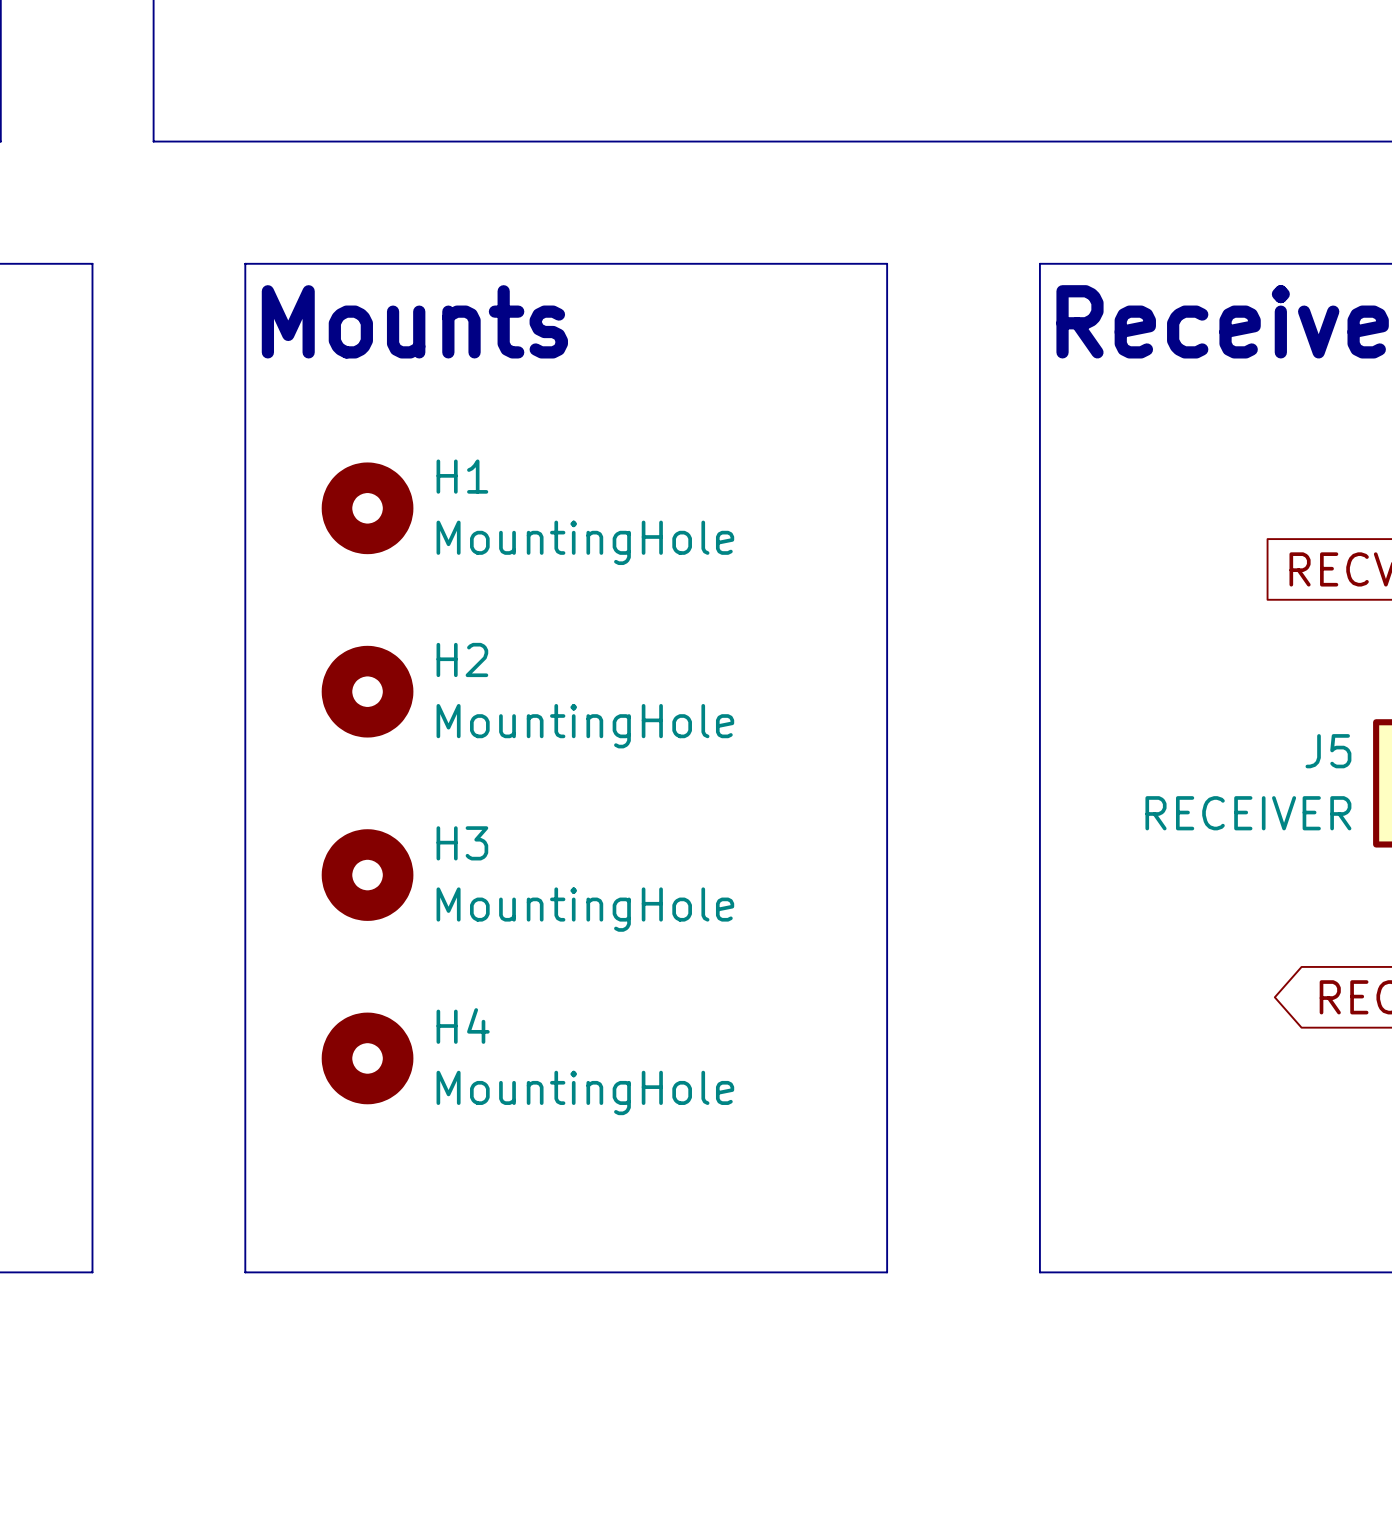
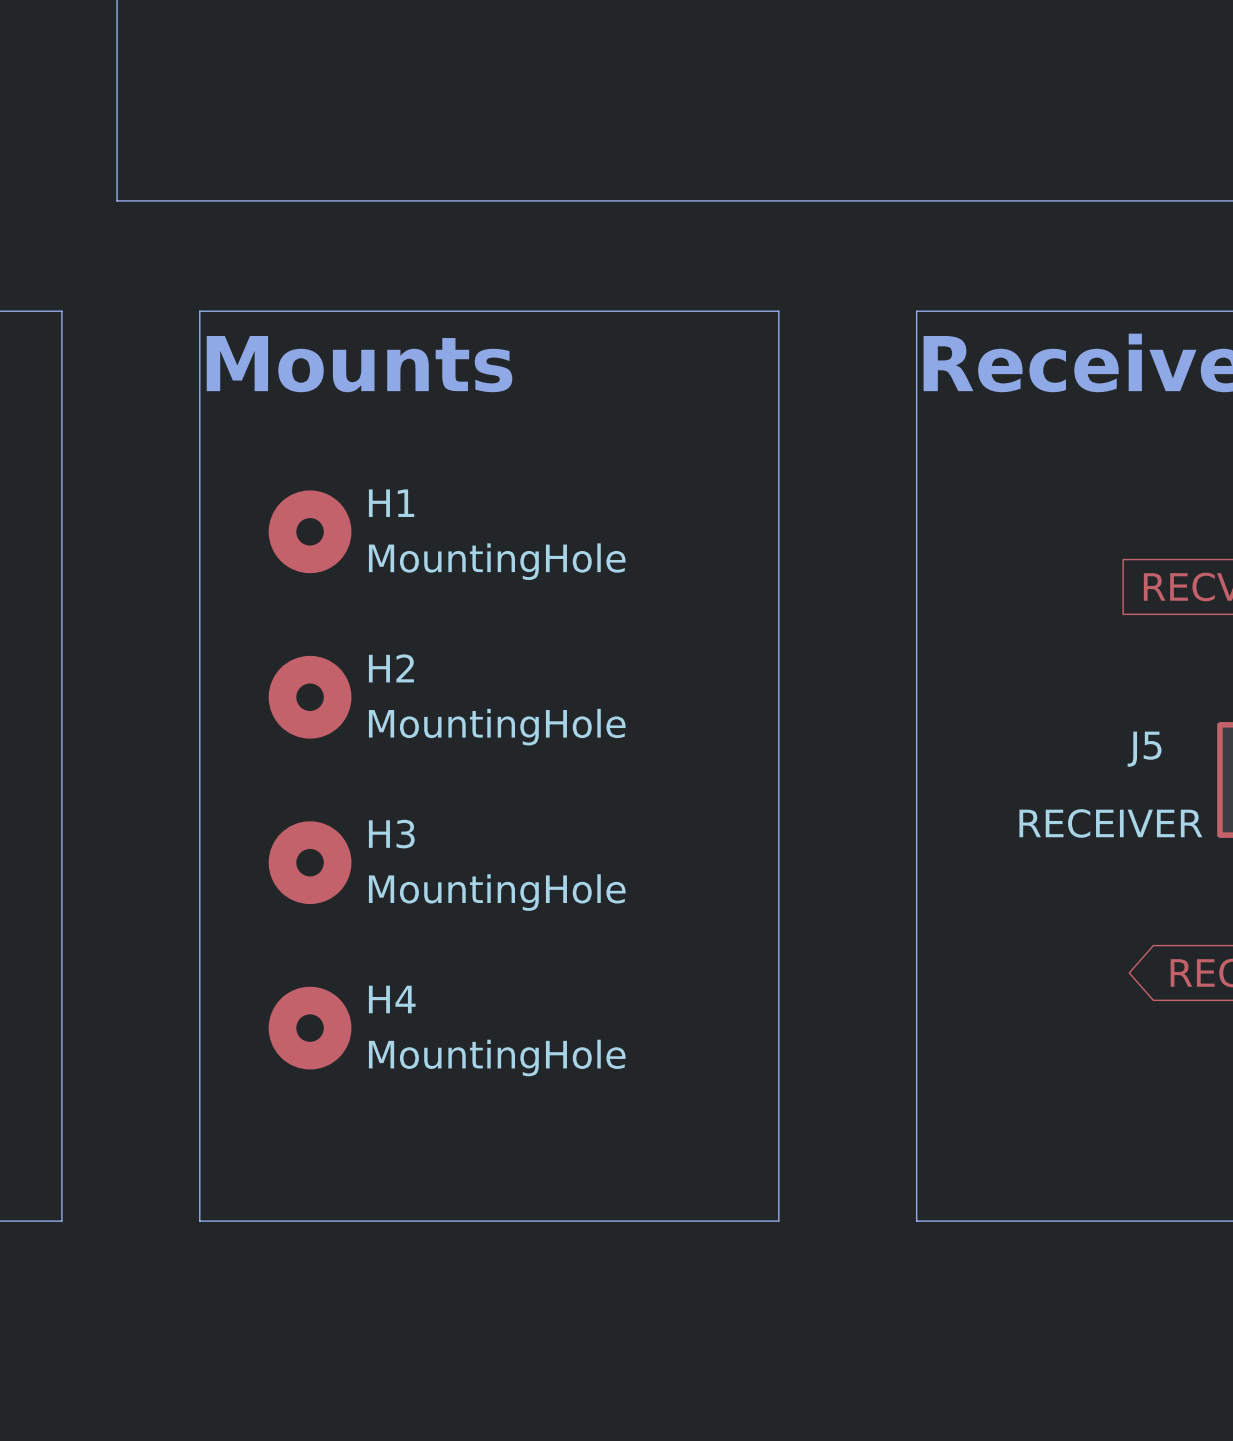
J5 name position: J5 (1328, 751) -> J5 (1144, 749)
J5 value position: RECEIVER (1248, 813) -> RECEIVER (1110, 823)

